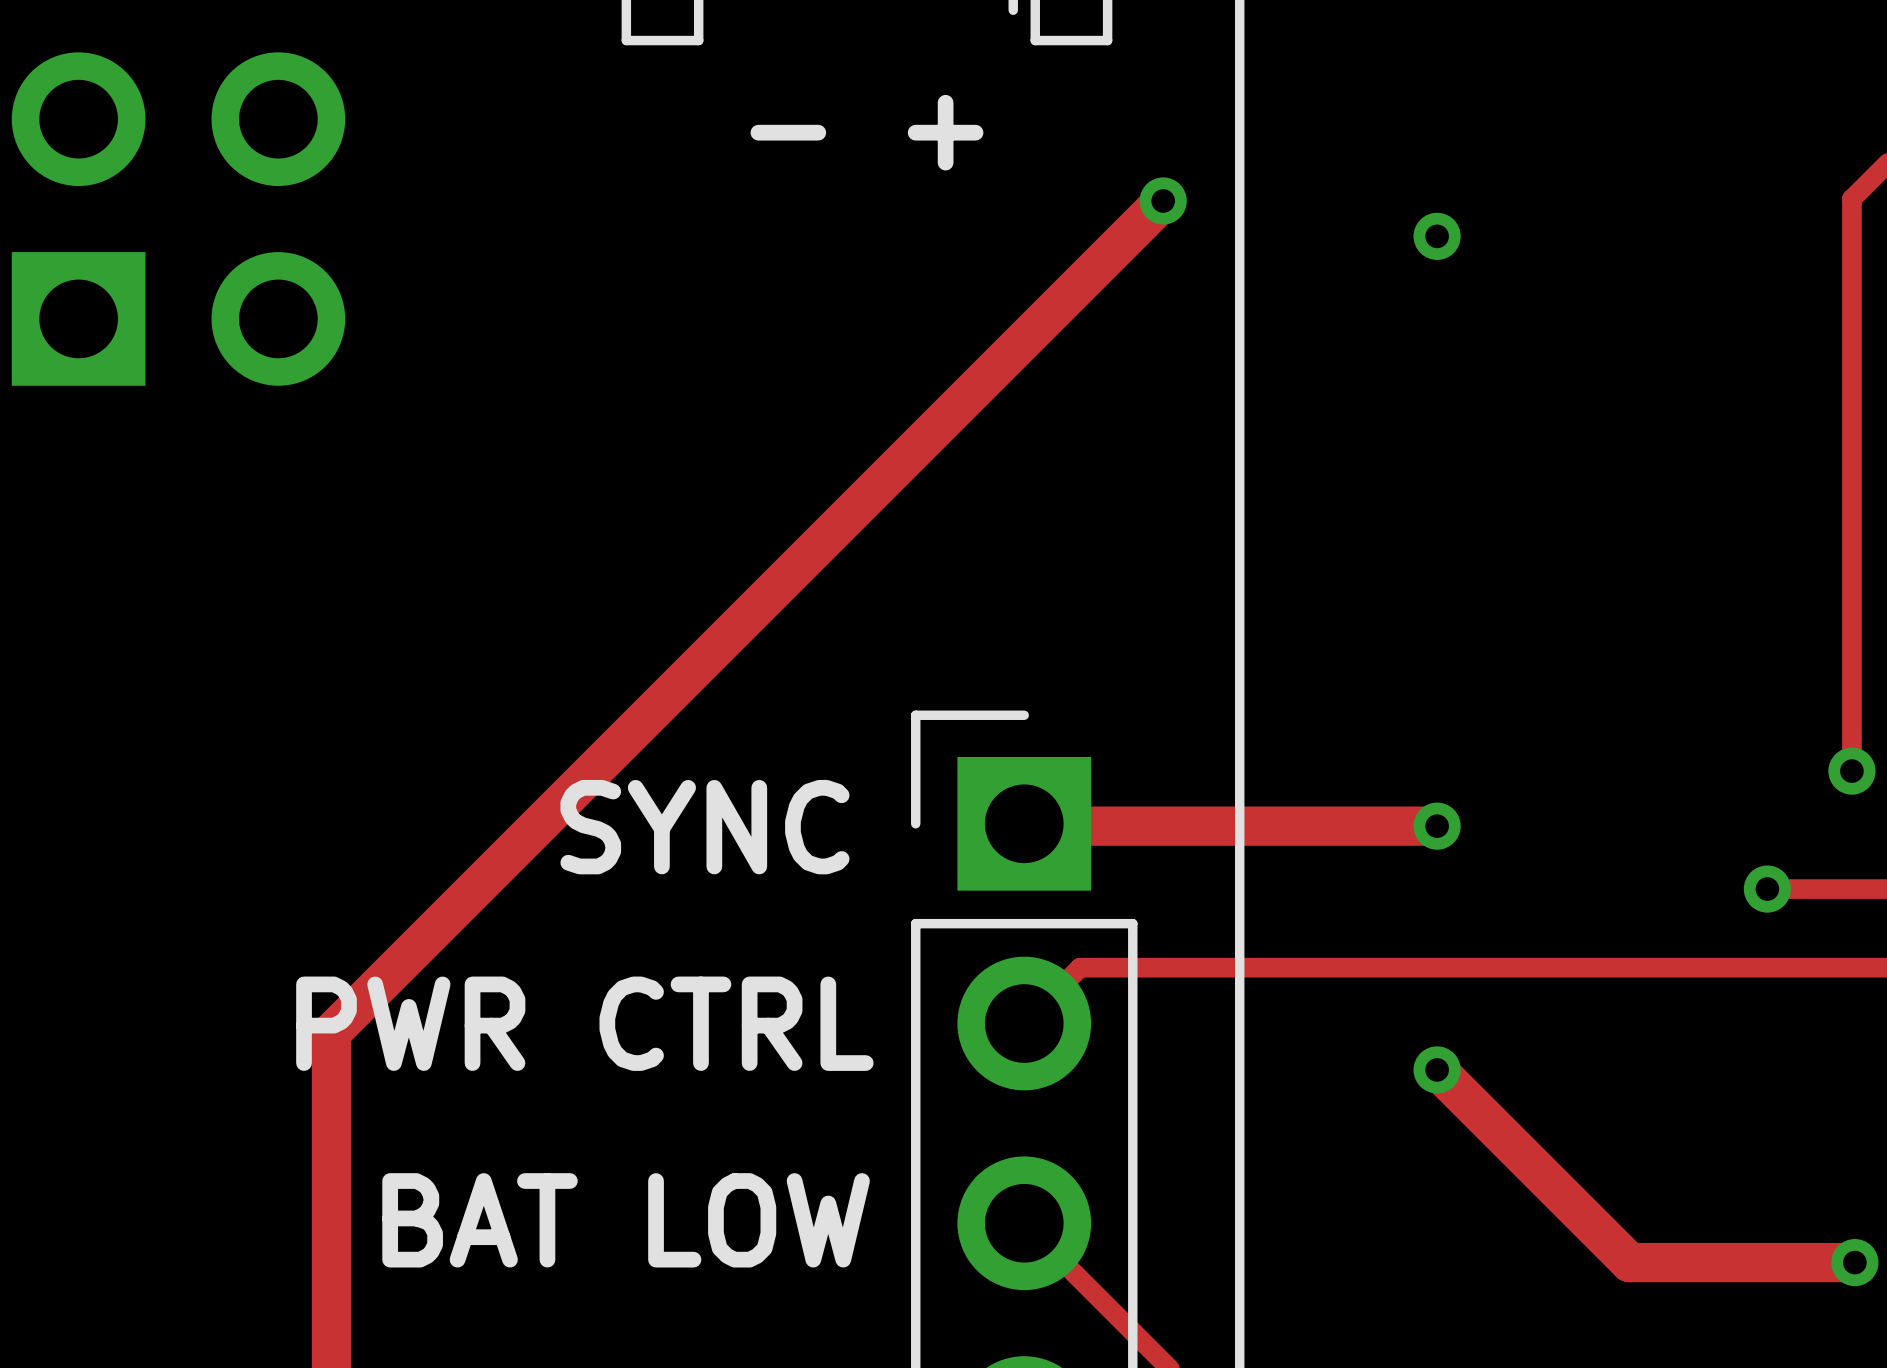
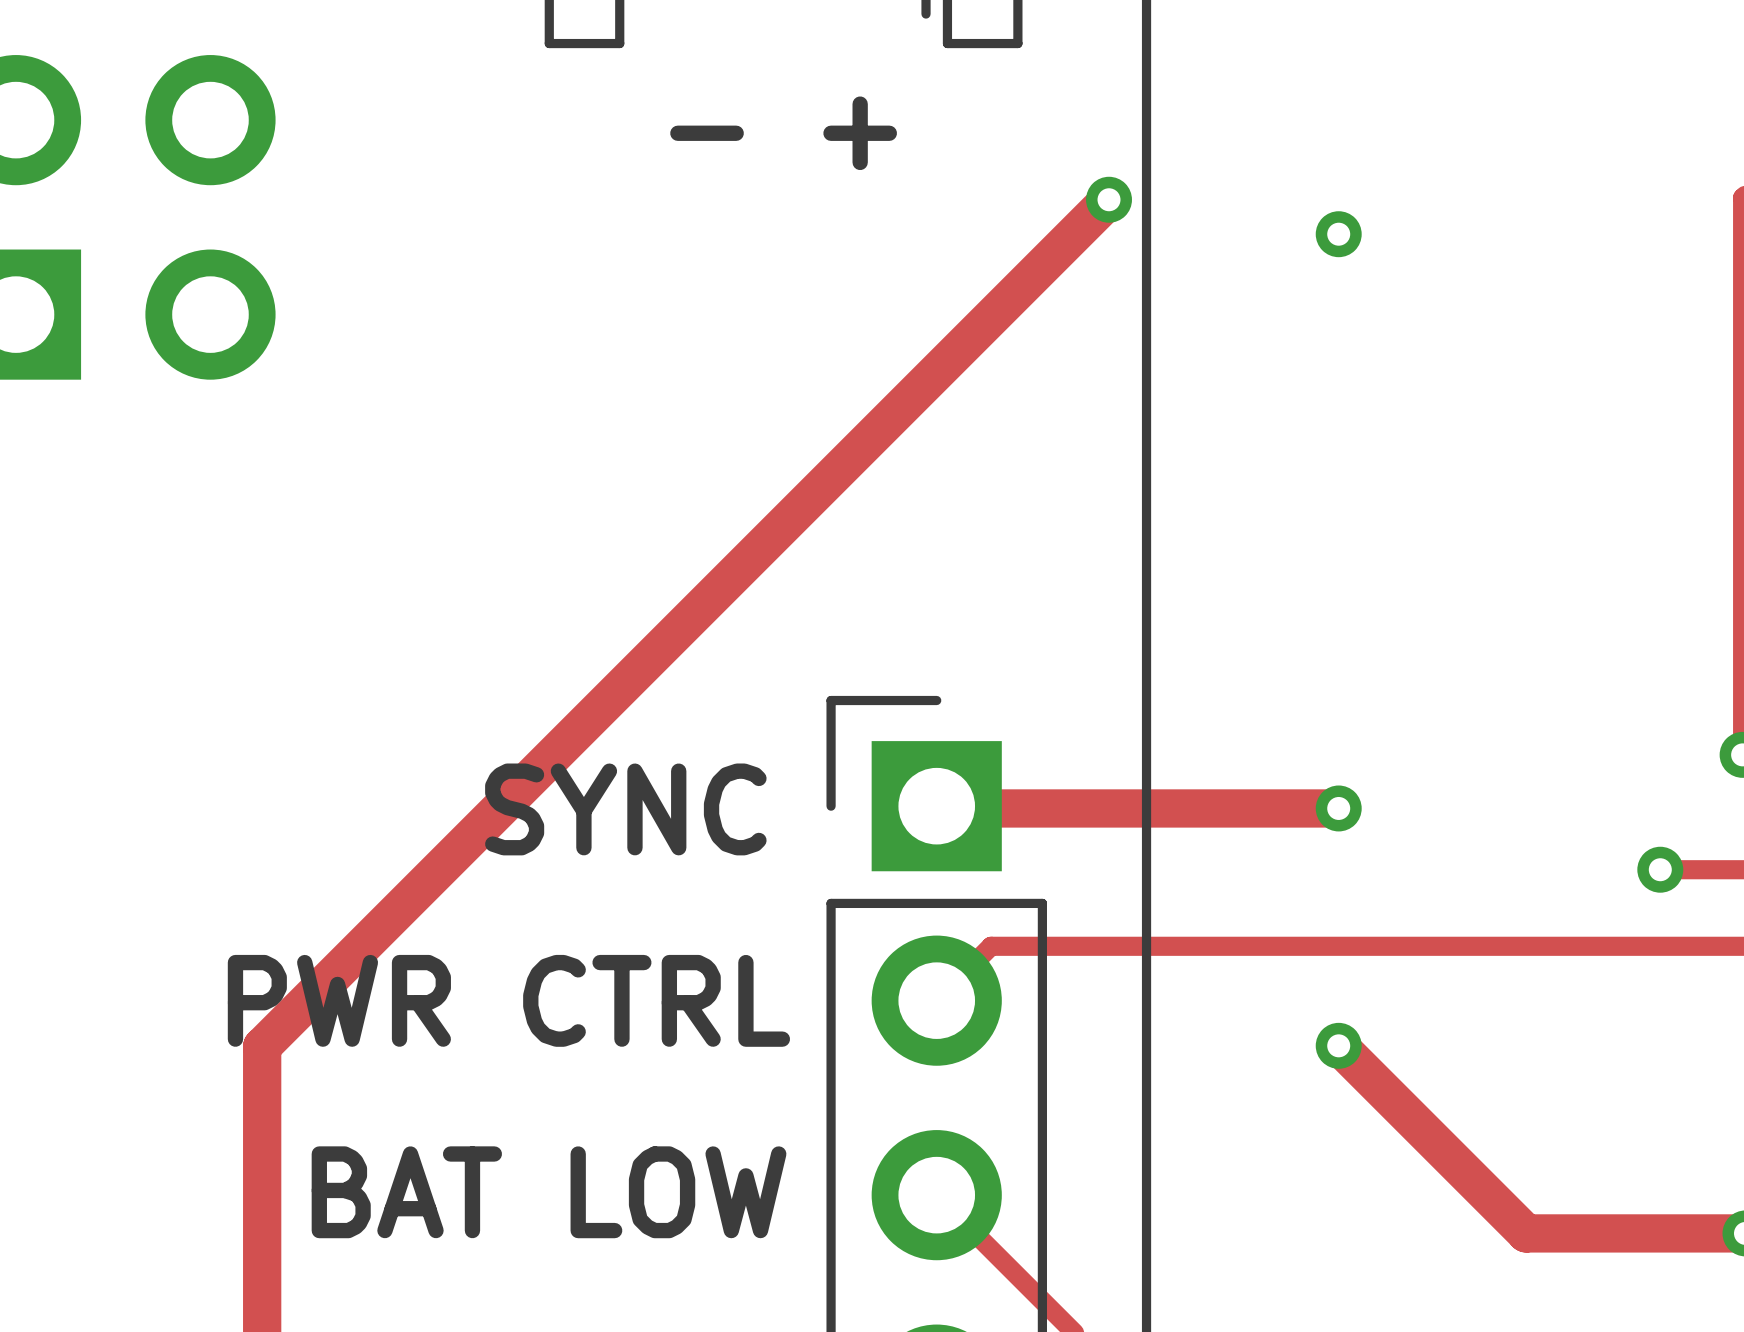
track: (1163, 200) (331, 1032) (331, 1070) -> (1109, 199) (262, 1046)
via position: (1163, 200) -> (1109, 199)

